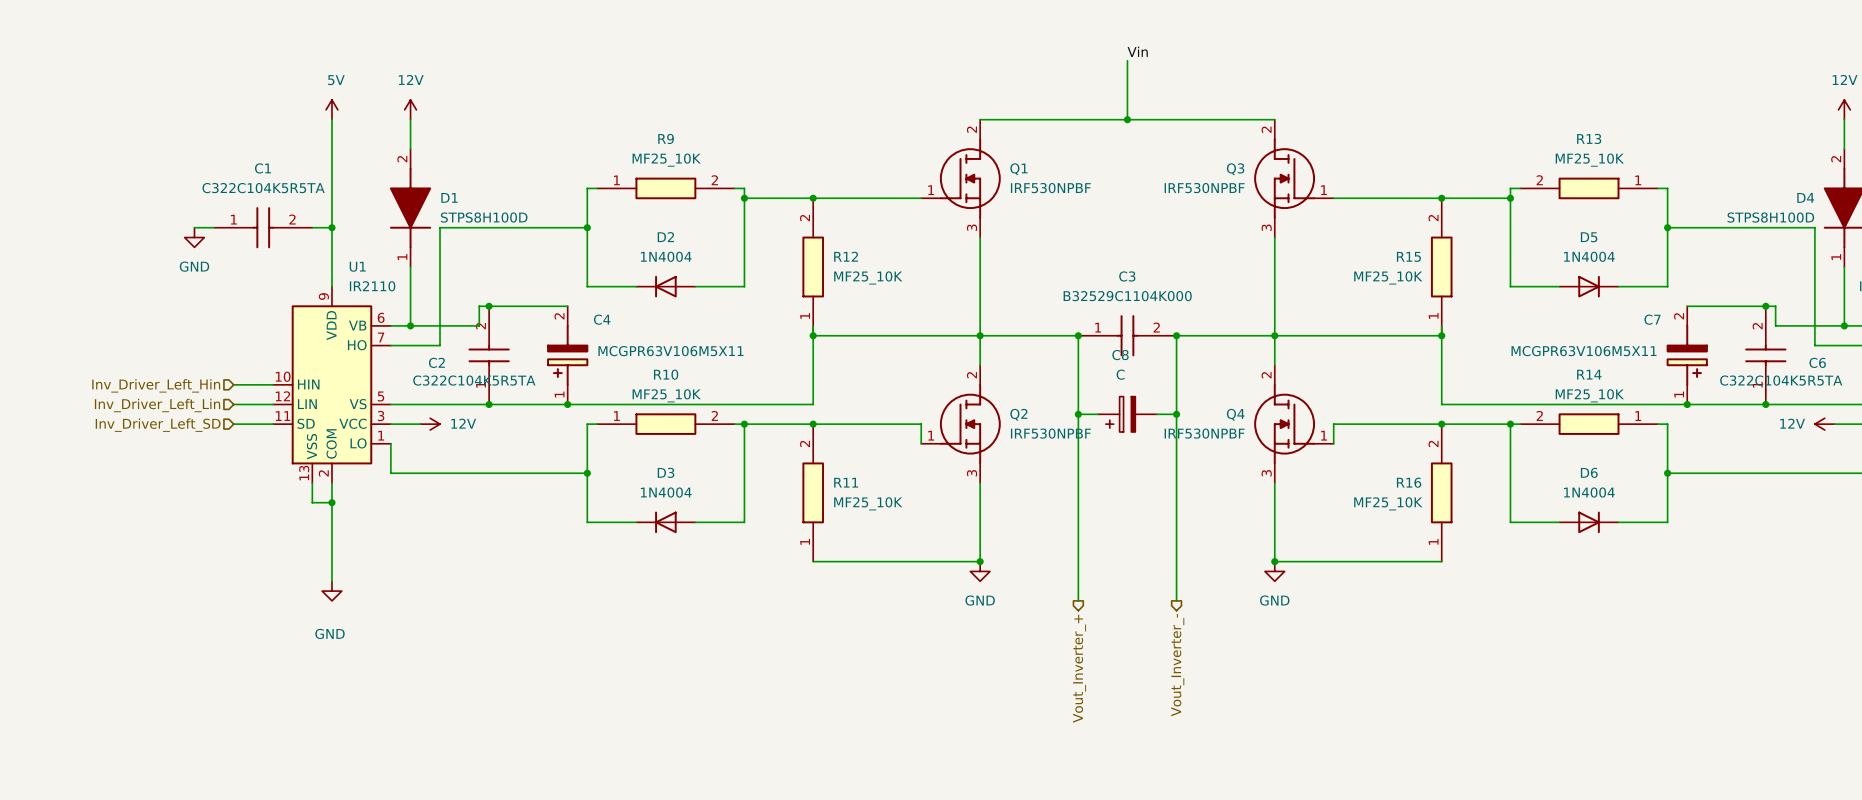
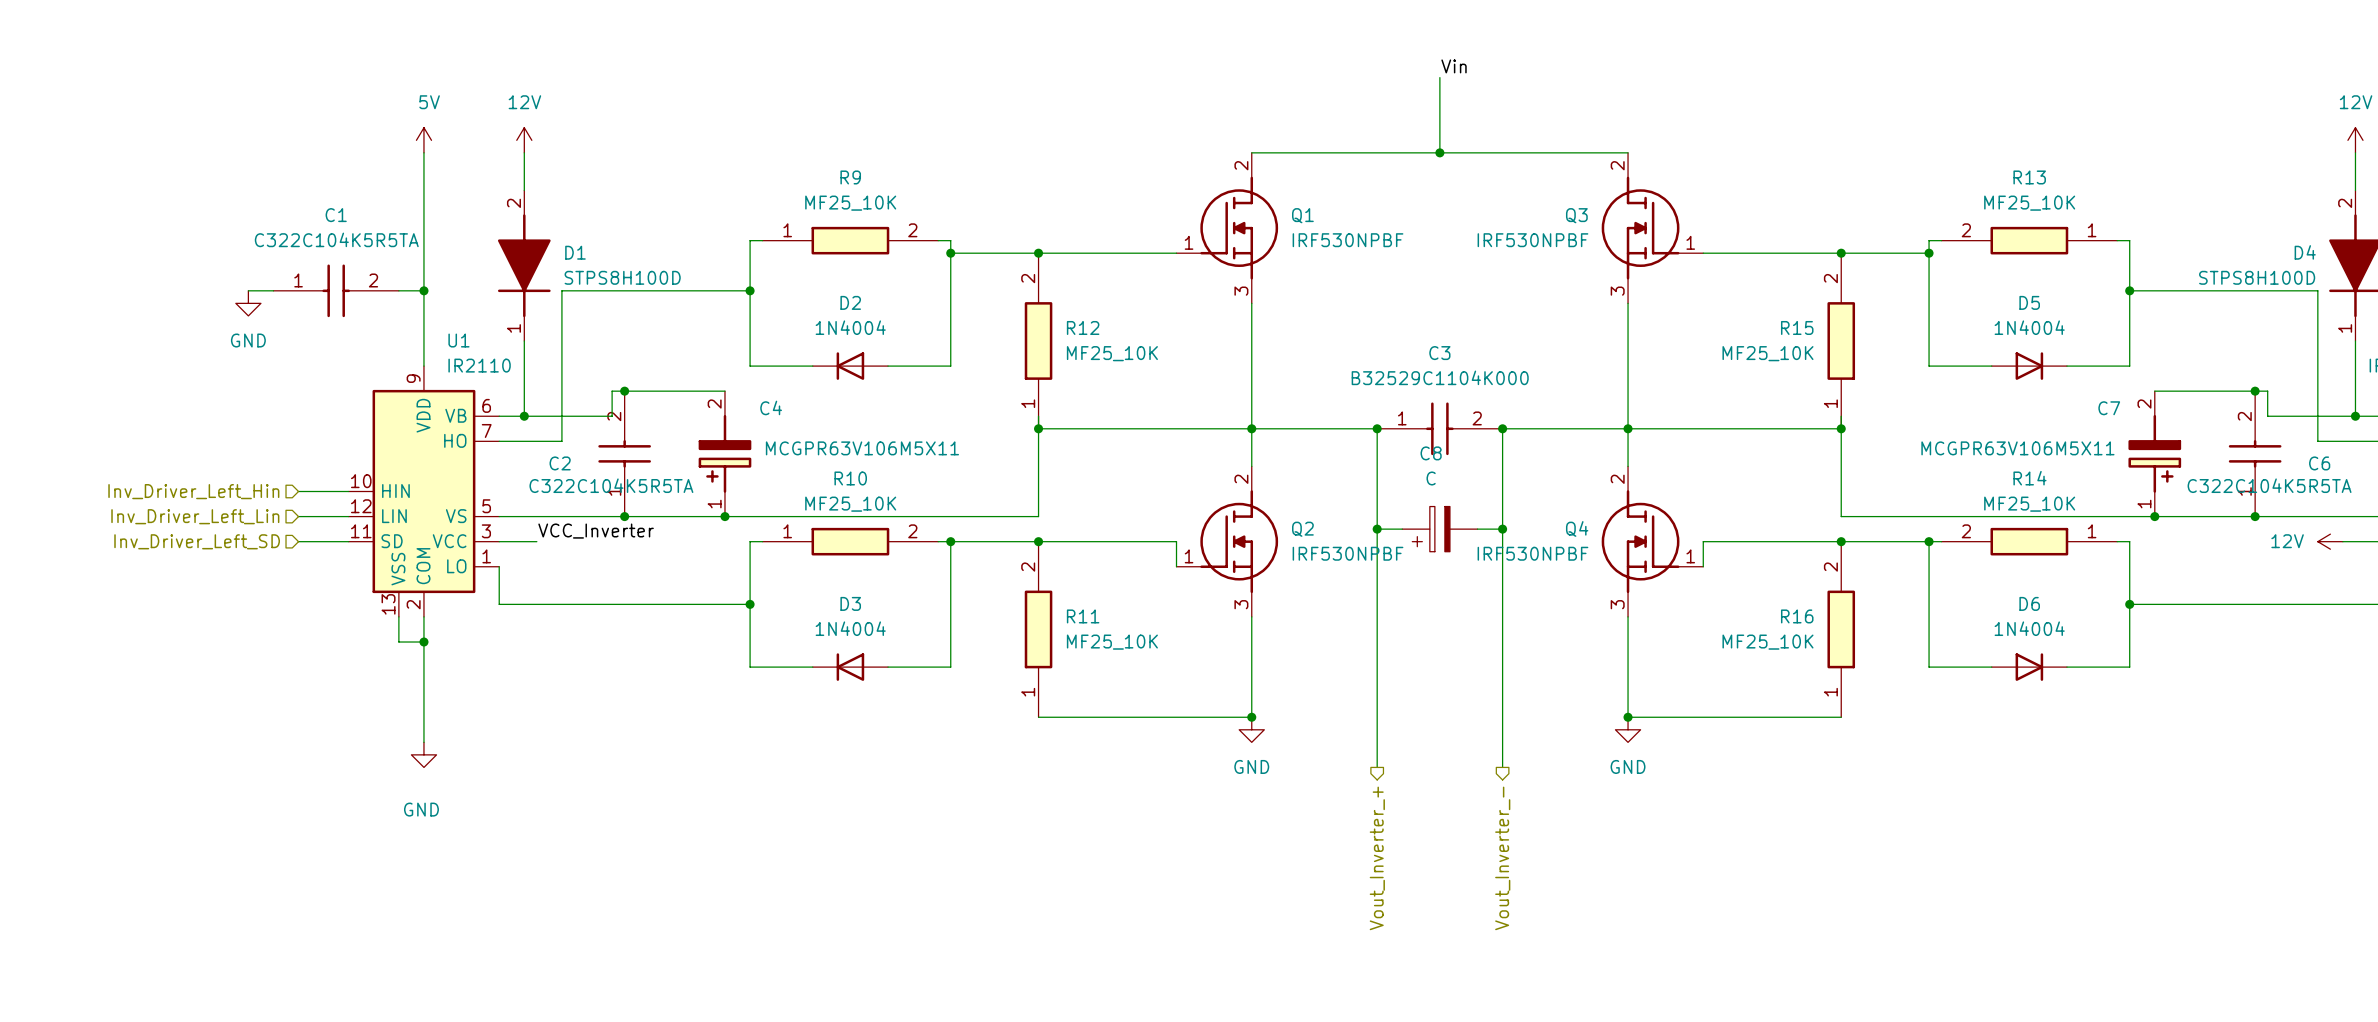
label: none -> VCC_Inverter (596, 531)
power symbol: 12V (430, 424) -> none

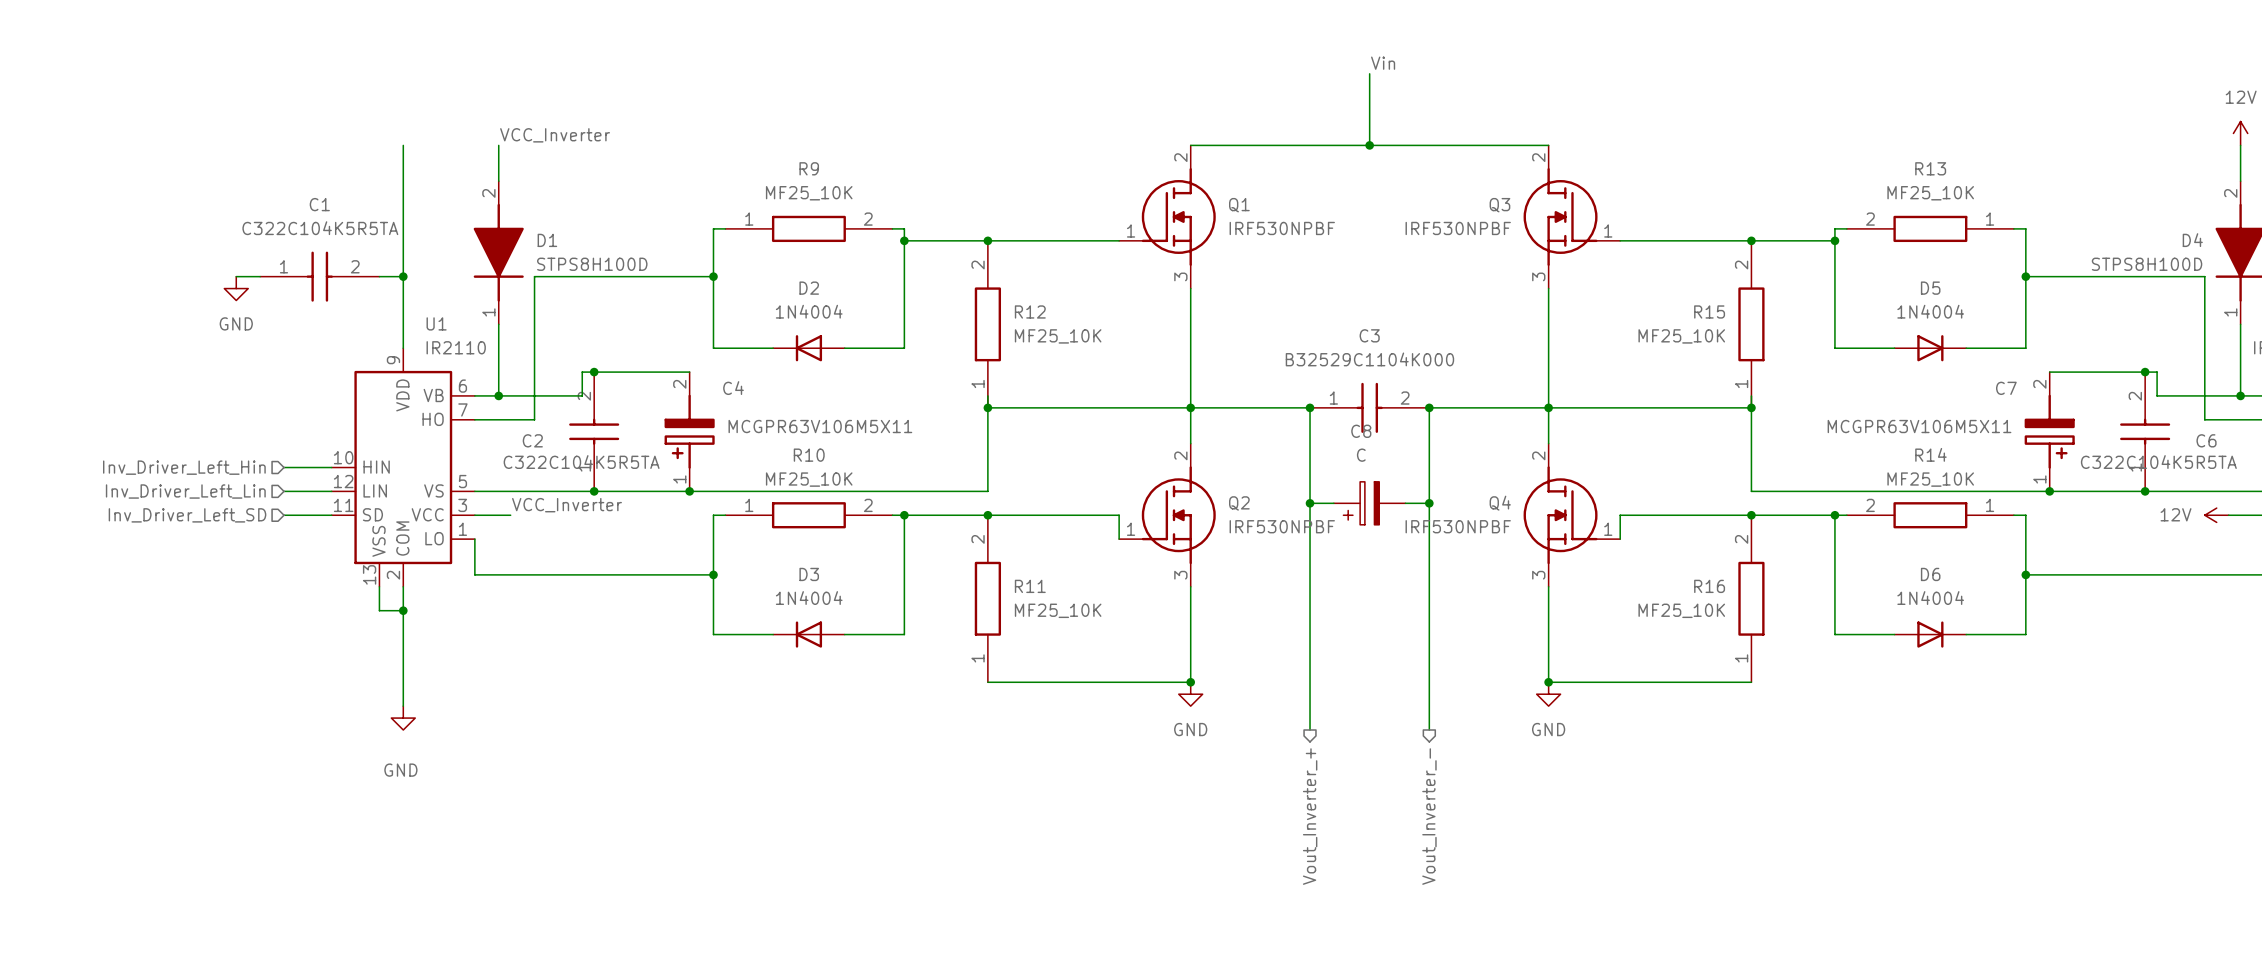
power symbol: 5V (423, 140) -> none
power symbol: 12V (524, 140) -> none
label: none -> VCC_Inverter (555, 135)

